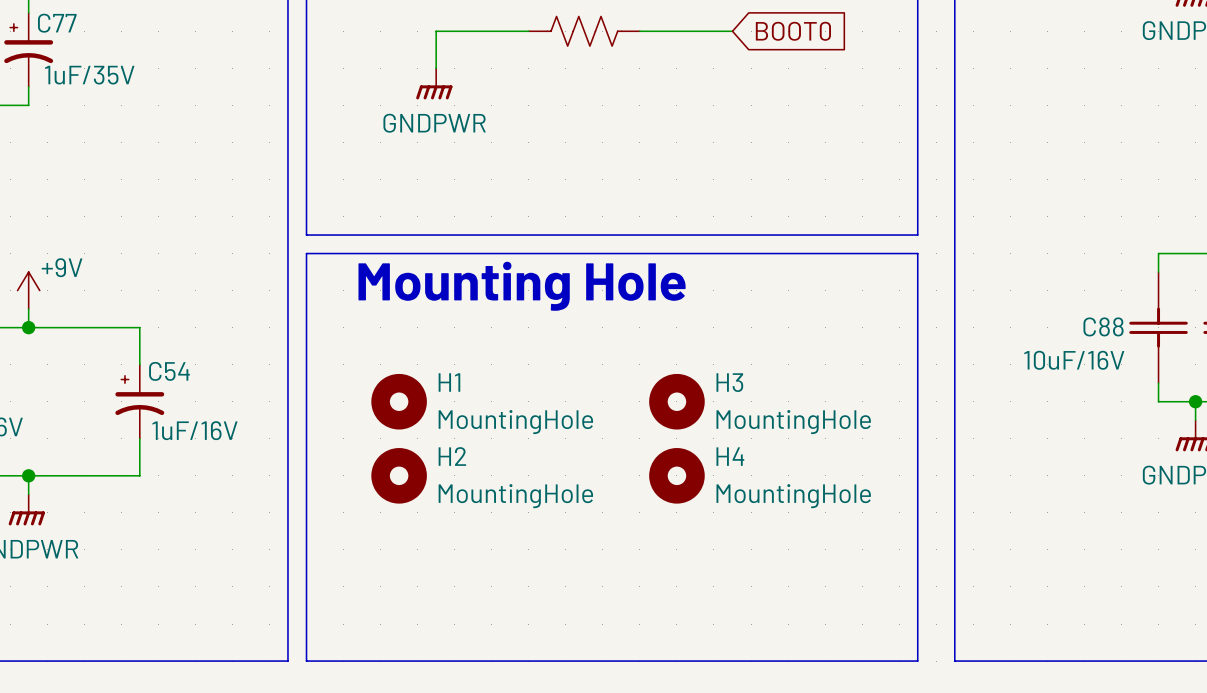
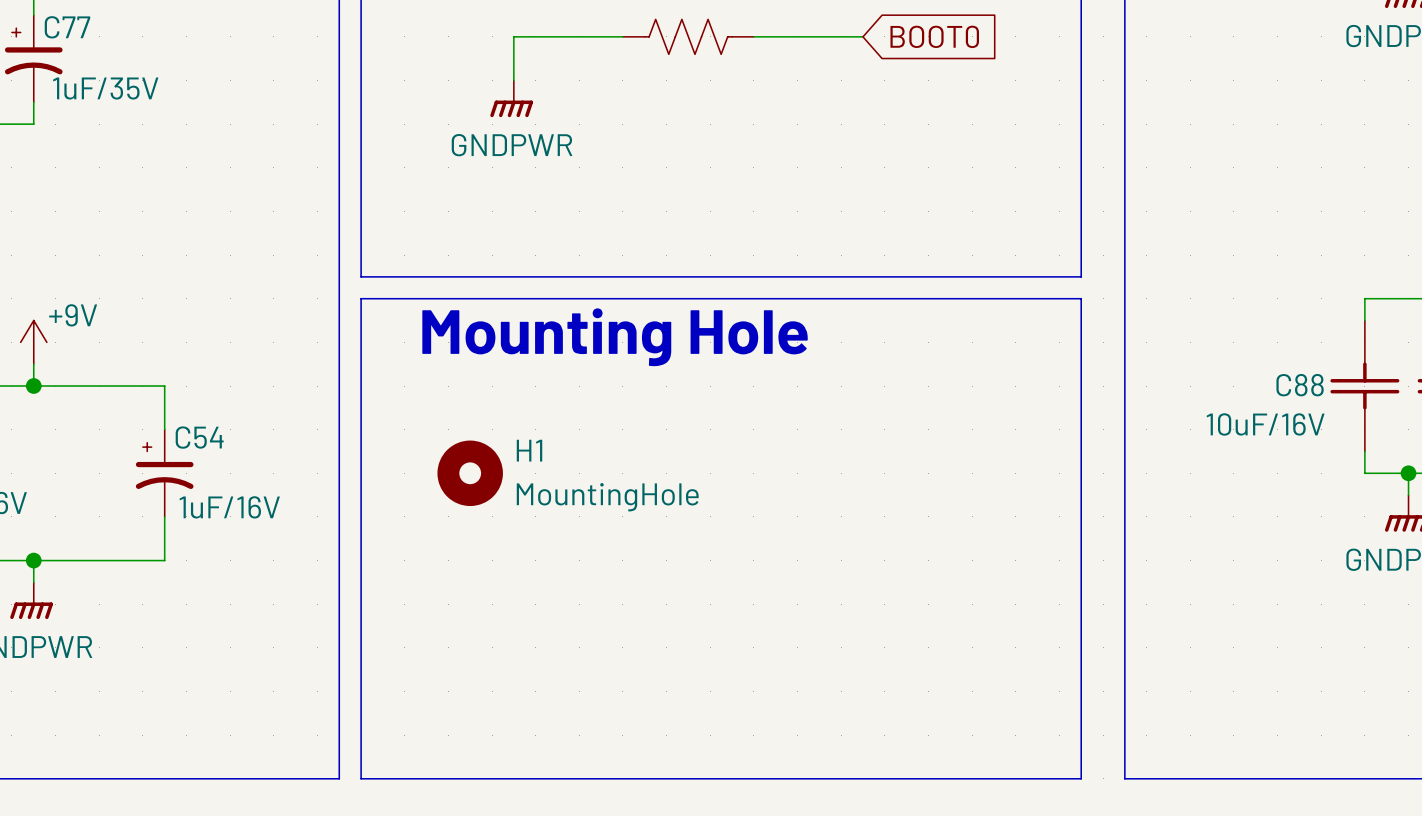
H3: MountingHole (676, 401) -> none
H2: MountingHole (399, 475) -> none
H4: MountingHole (676, 475) -> none

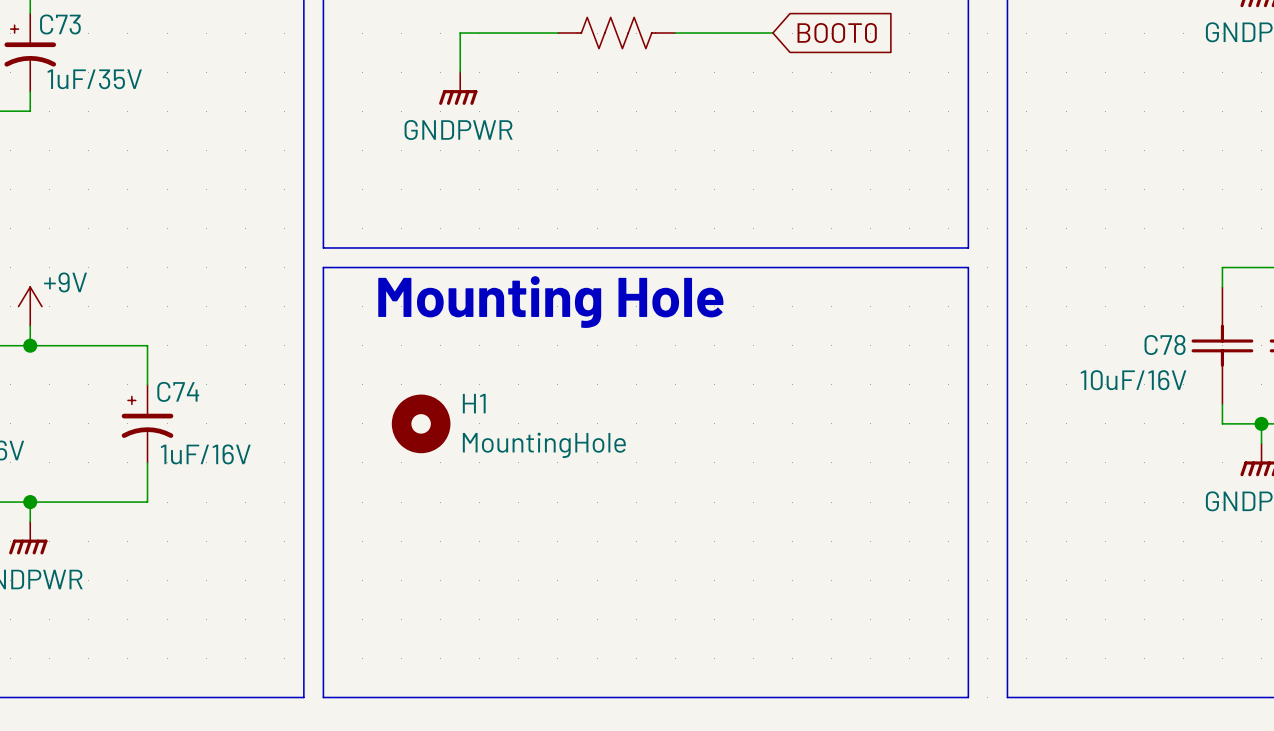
C77 name: C77 (67, 27) -> C73 (60, 24)
C88 name: C88 (1300, 385) -> C78 (1165, 344)
C54 name: C54 (199, 437) -> C74 (178, 391)

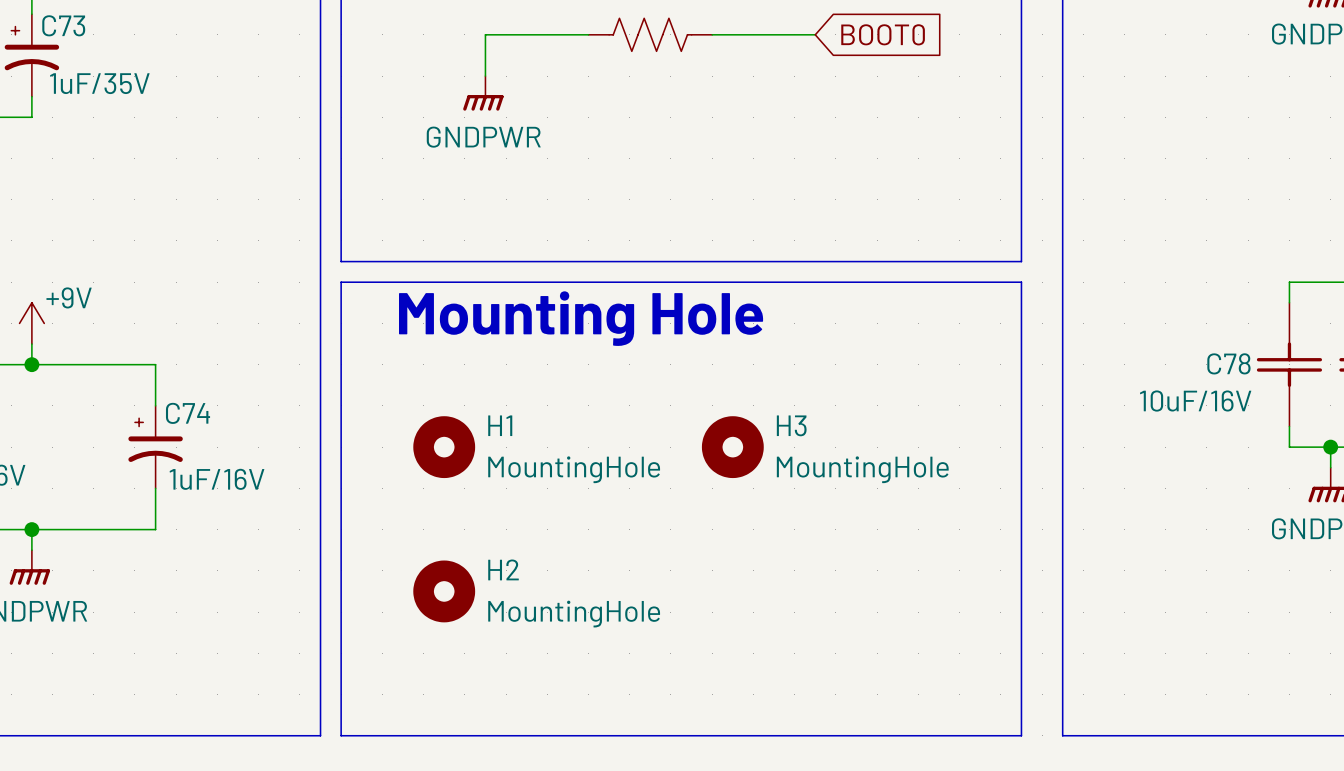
H3: none -> MountingHole (732, 447)
H2: none -> MountingHole (444, 591)

